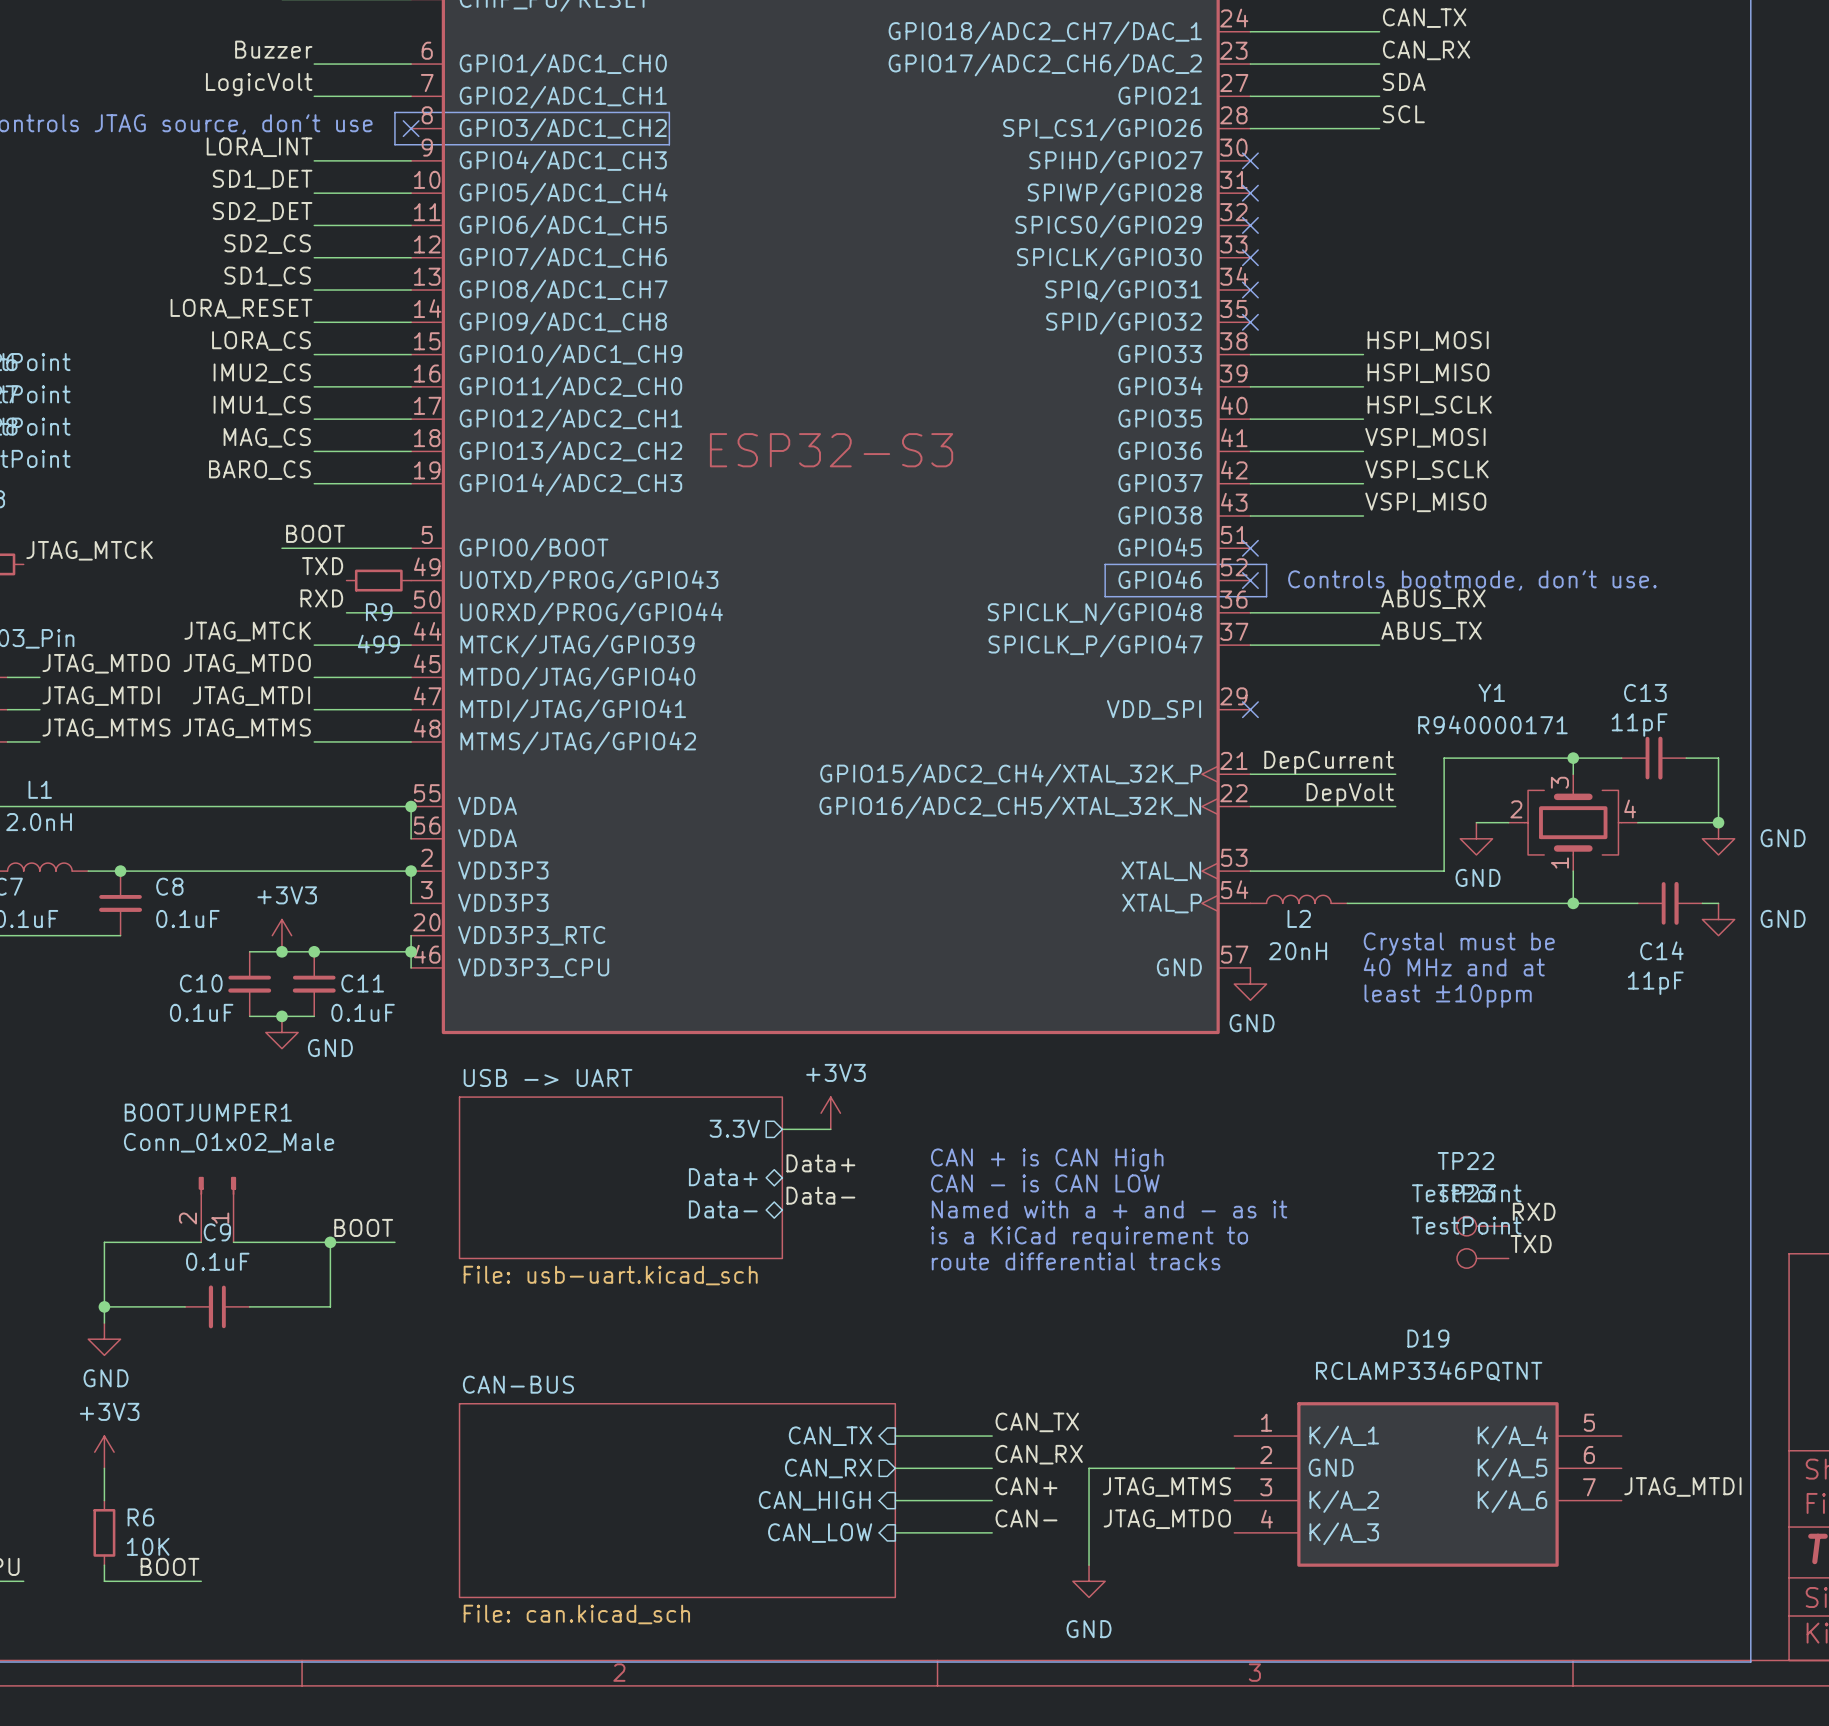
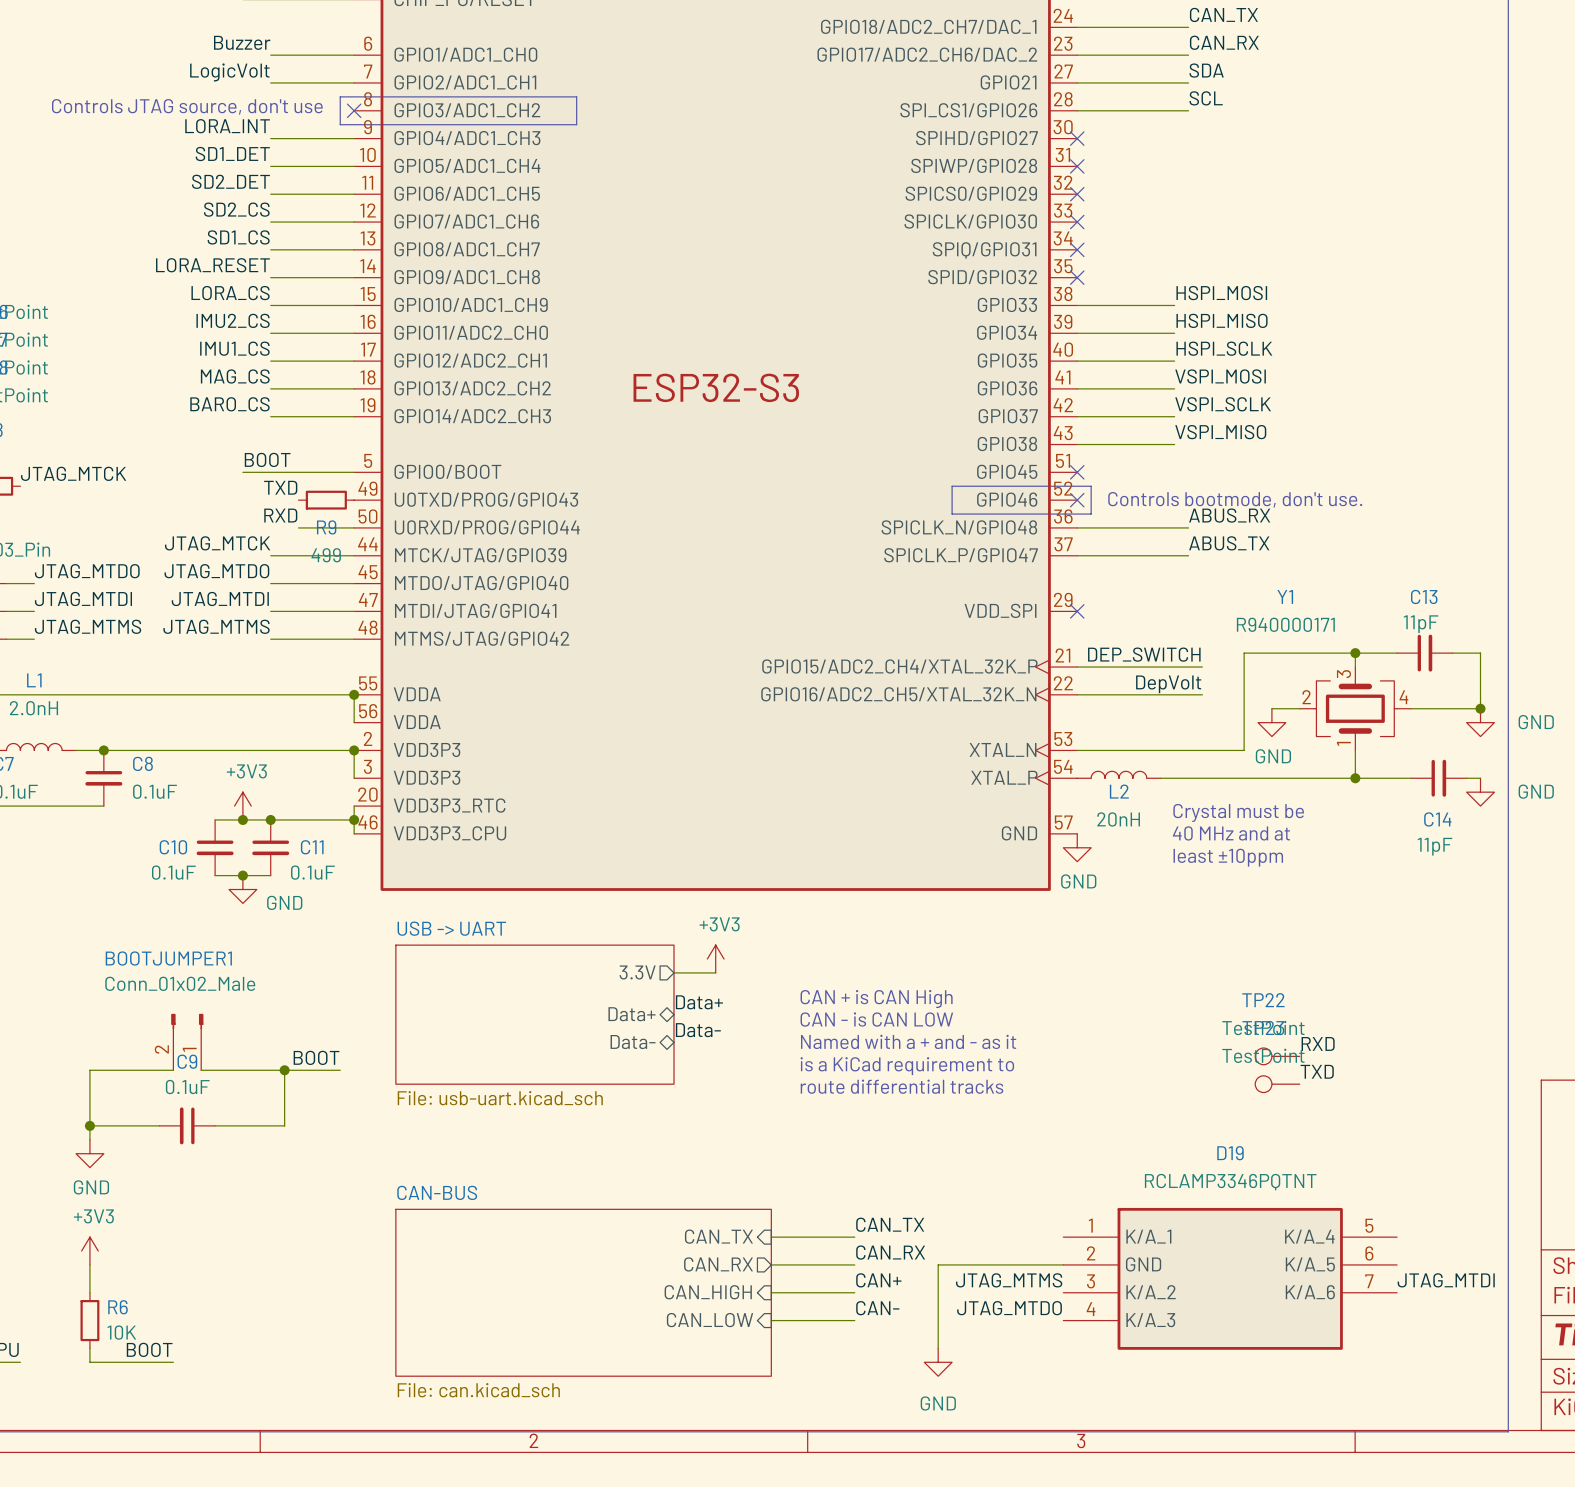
label: DepCurrent (1329, 762) -> DEP_SWITCH (1144, 654)

